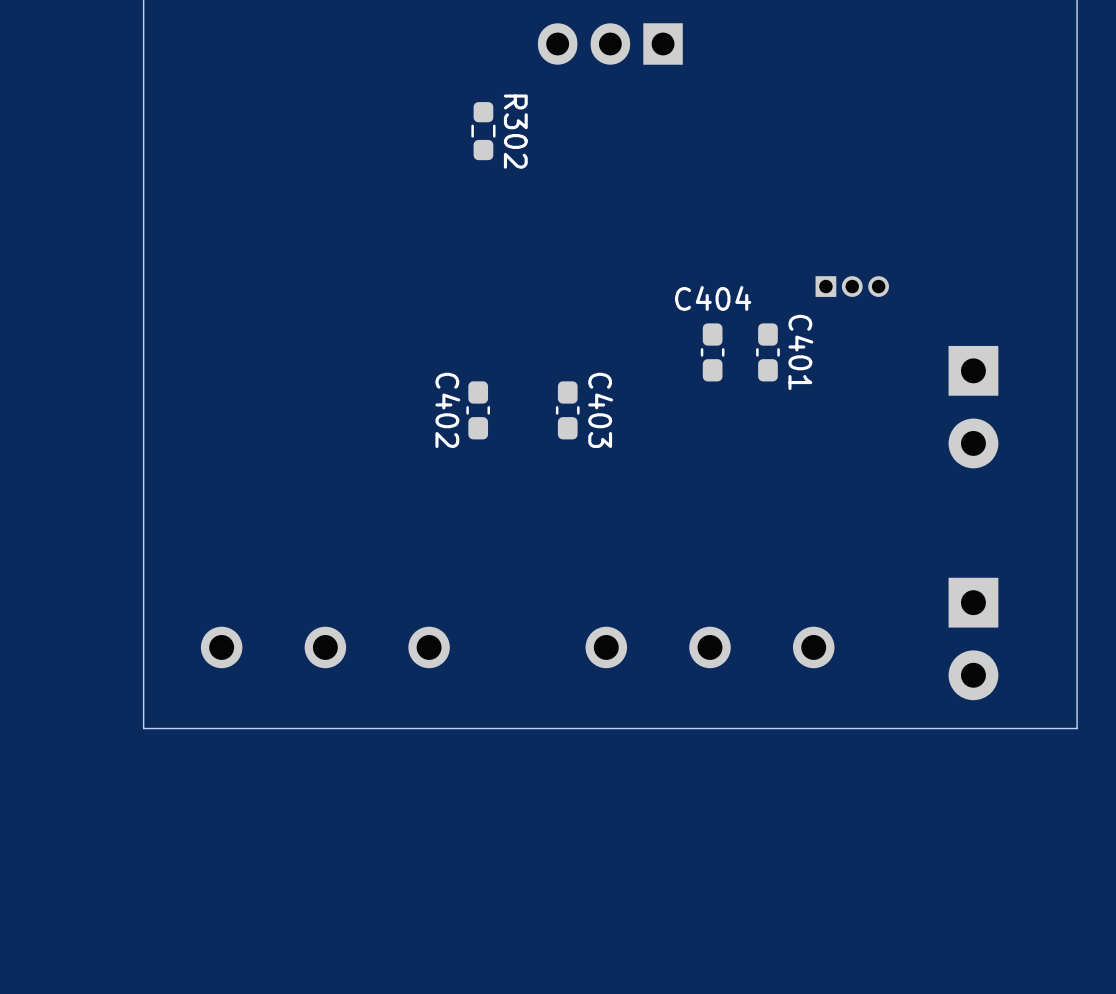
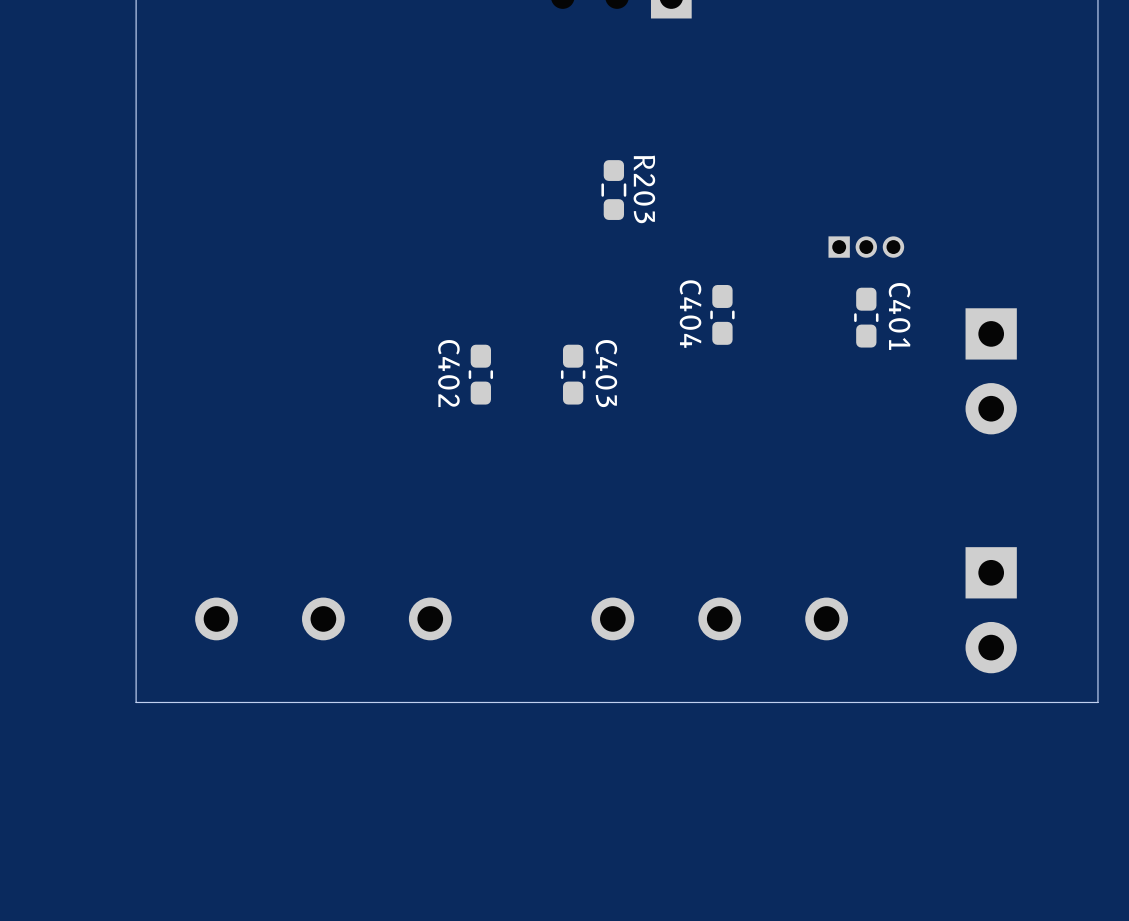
R302: (483, 131) -> none
R203: none -> (613, 190)
C404 name rotation: 0° (713, 298) -> 90° clockwise (690, 314)
C401 position: (767, 352) -> (866, 317)

